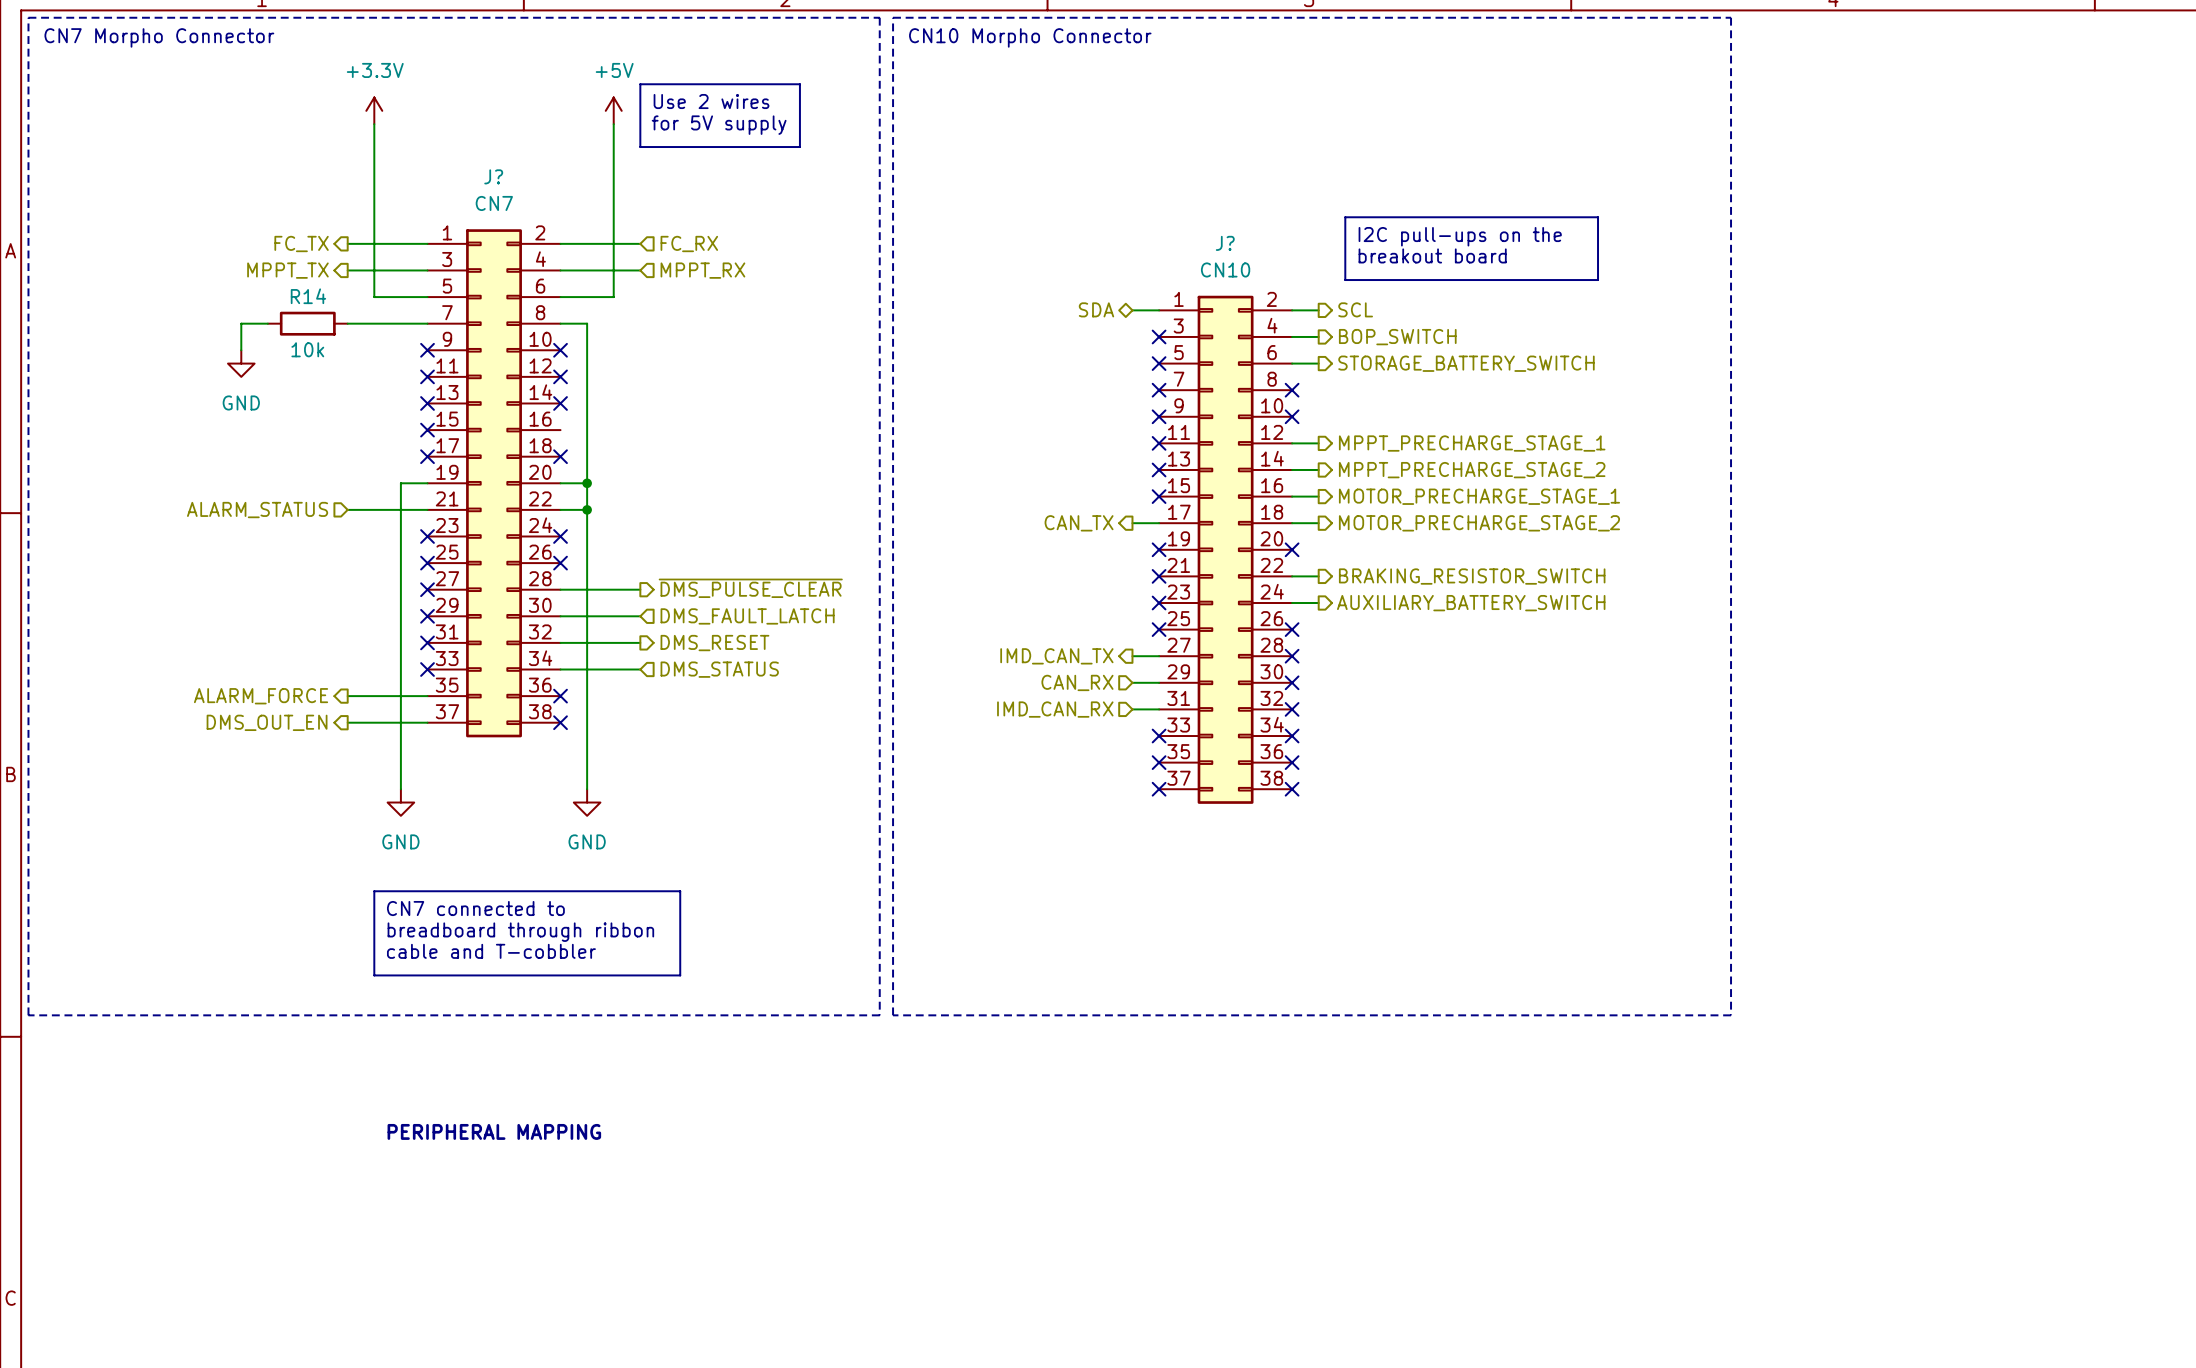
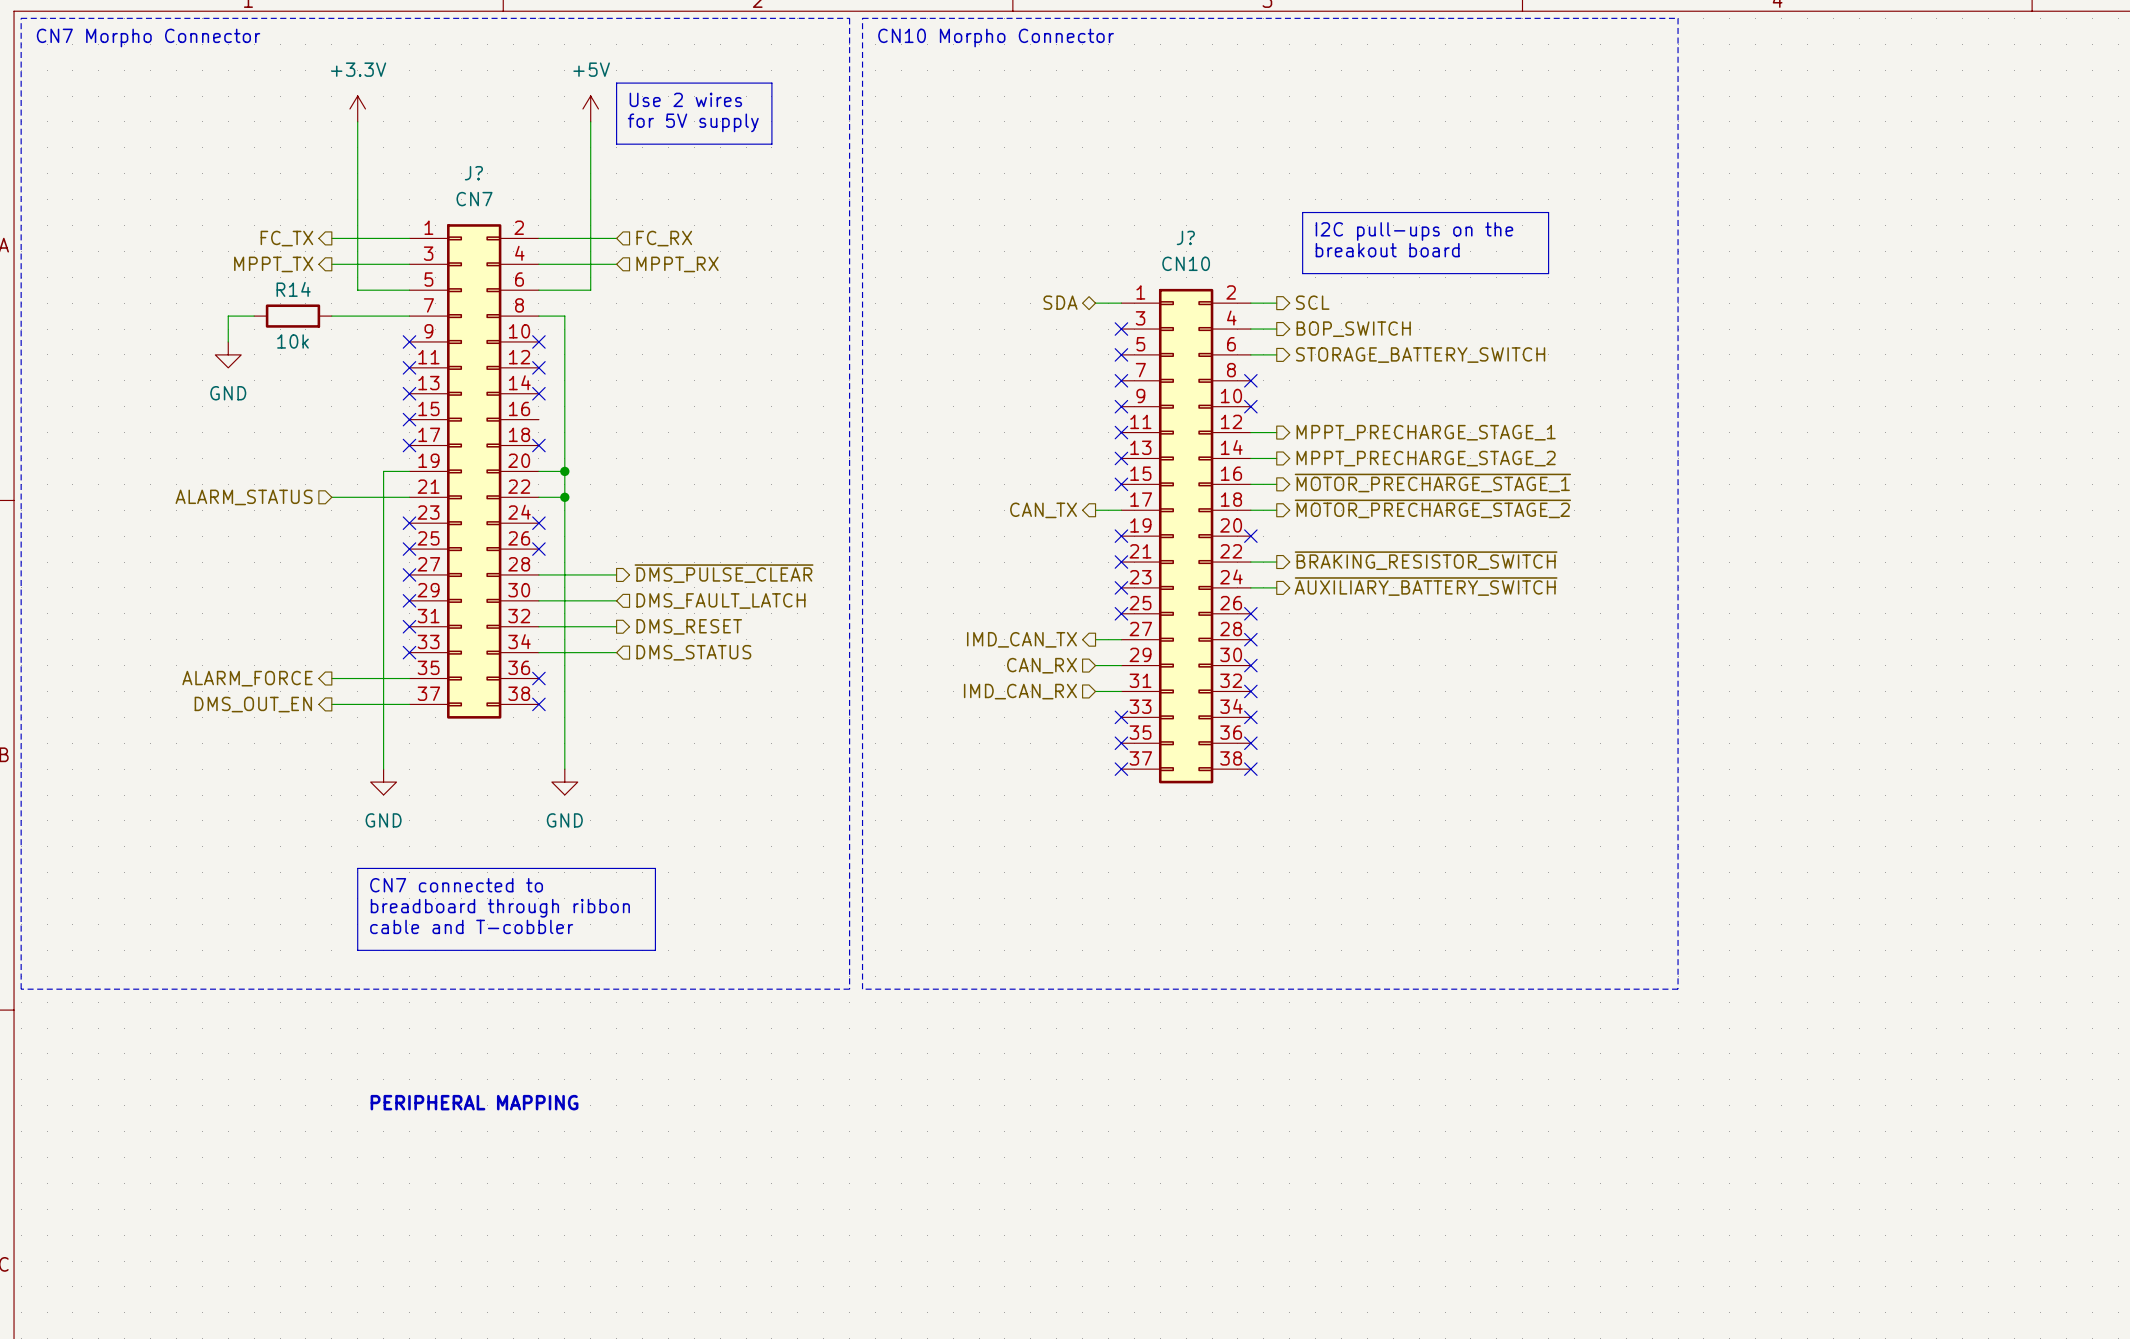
hierarchical label: MOTOR_PRECHARGE_STAGE_1 (1479, 496) -> ~{MOTOR_PRECHARGE_STAGE_1} (1432, 483)
hierarchical label: MOTOR_PRECHARGE_STAGE_2 (1479, 523) -> ~{MOTOR_PRECHARGE_STAGE_2} (1432, 508)
hierarchical label: BRAKING_RESISTOR_SWITCH (1472, 576) -> ~{BRAKING_RESISTOR_SWITCH} (1426, 560)
hierarchical label: AUXILIARY_BATTERY_SWITCH (1471, 603) -> ~{AUXILIARY_BATTERY_SWITCH} (1426, 586)

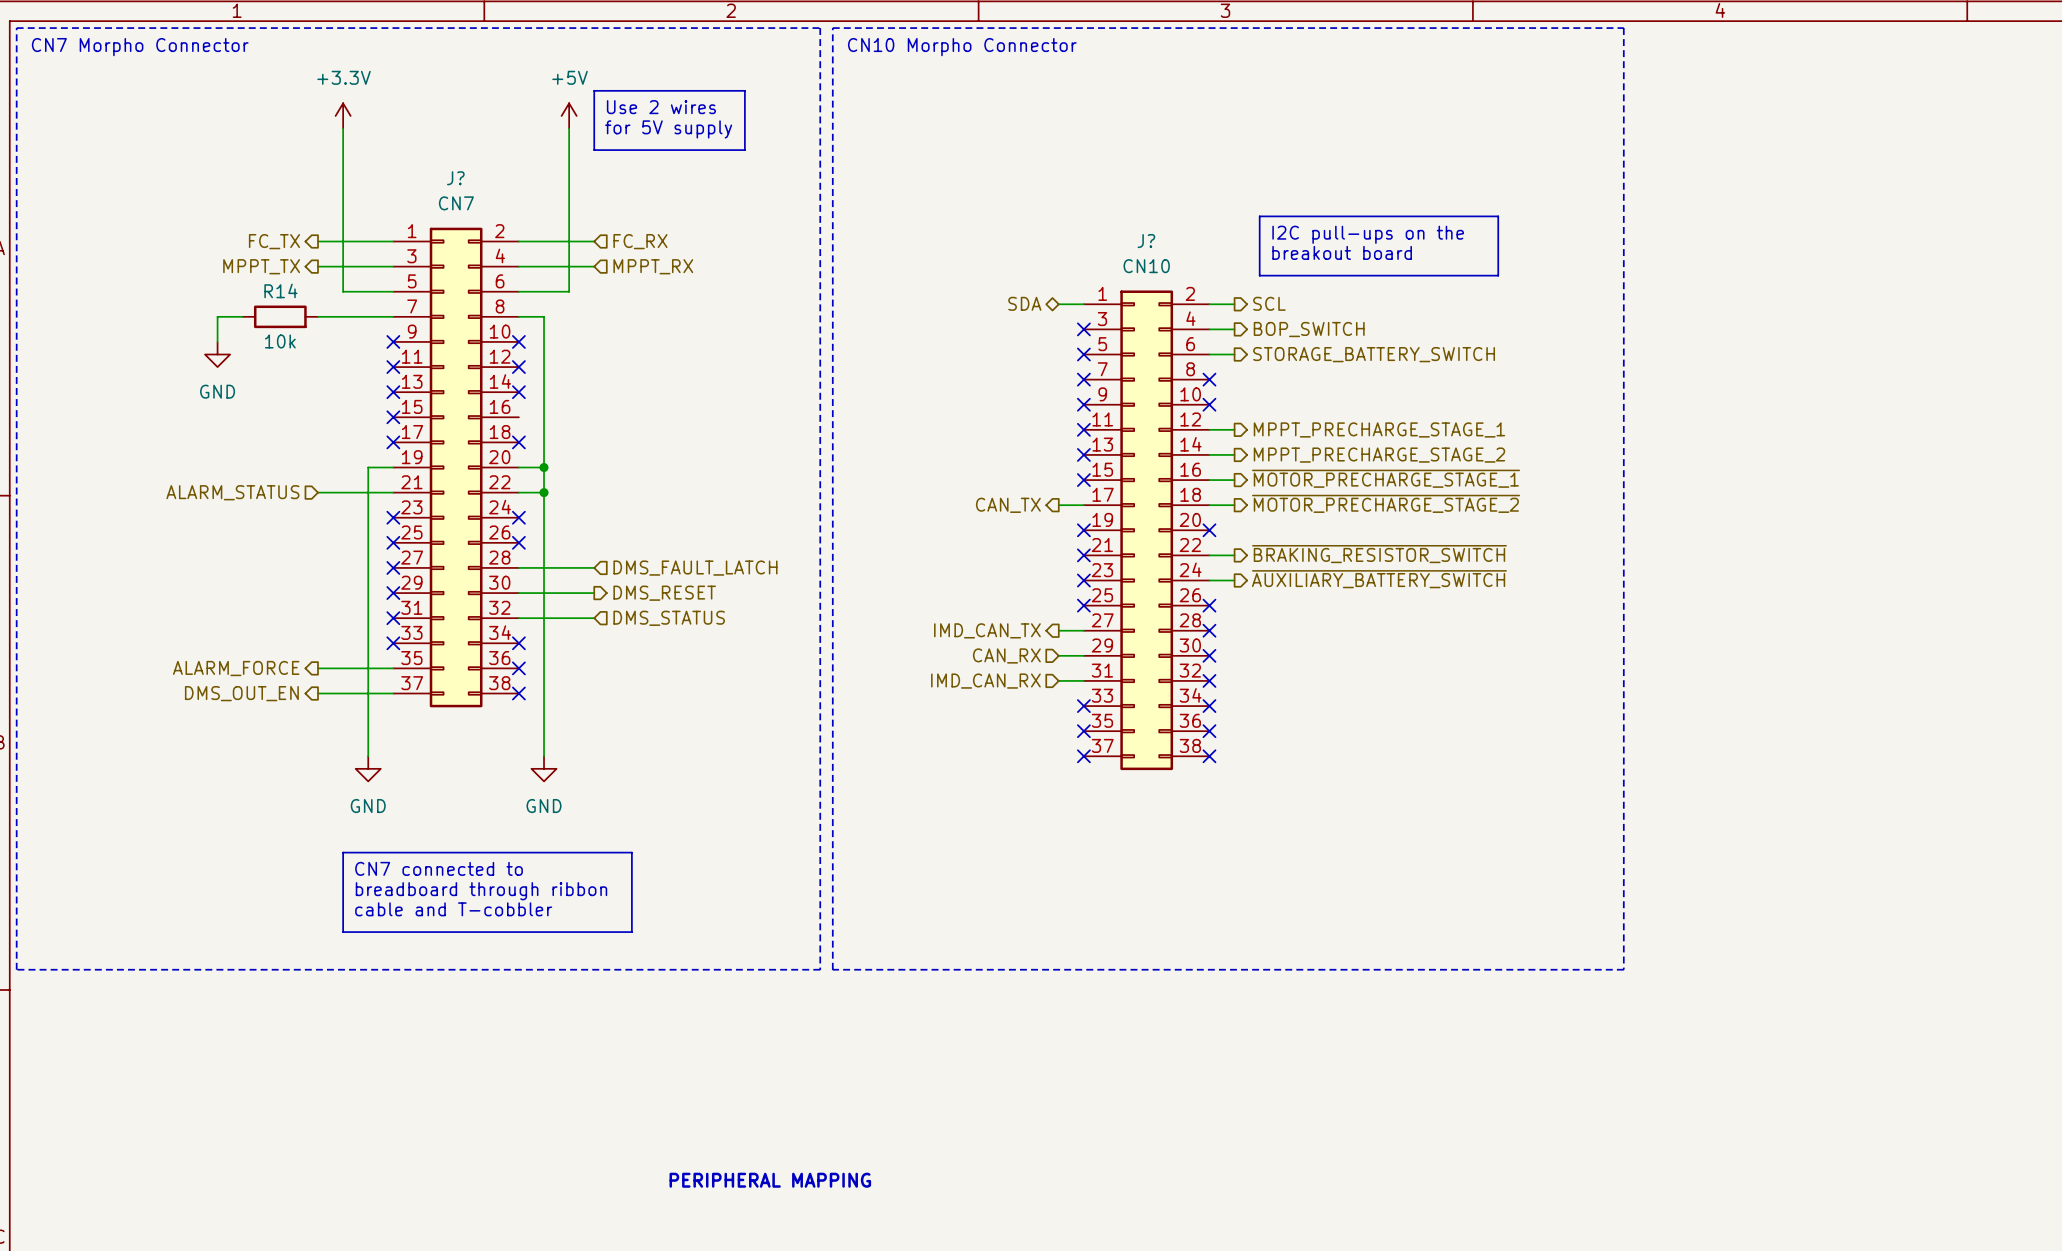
hierarchical label shape: output (724, 573) -> input (695, 568)
hierarchical label: ~{DMS_PULSE_CLEAR} (724, 573) -> DMS_FAULT_LATCH (695, 568)
hierarchical label shape: input (720, 600) -> output (664, 593)
hierarchical label: DMS_FAULT_LATCH (720, 600) -> DMS_RESET (664, 593)
hierarchical label shape: output (689, 626) -> input (669, 618)
hierarchical label: DMS_RESET (689, 626) -> DMS_STATUS (669, 618)
wire: (538, 652) (616, 652) -> none
no-connect mark: none -> (518, 643)
hierarchical label: DMS_STATUS (693, 652) -> none
text: PERIPHERAL MAPPING (474, 1102) -> none
text: none -> PERIPHERAL MAPPING (770, 1180)

